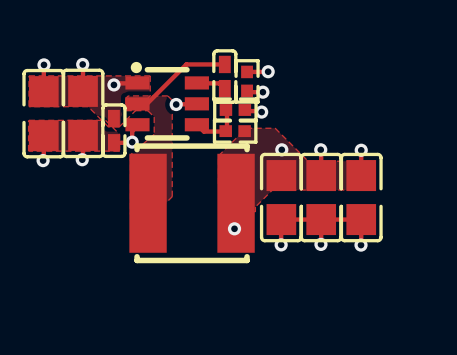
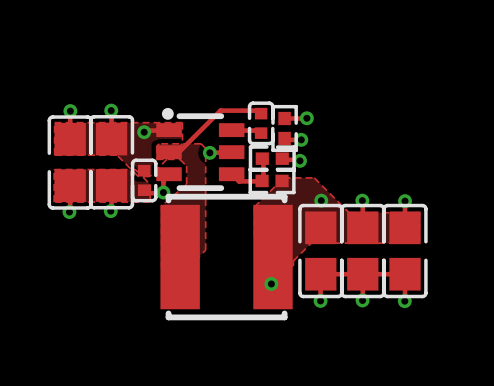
part footprint: [212, 49, 238, 104] -> [247, 101, 275, 146]
part footprint: [101, 103, 127, 159] -> [130, 158, 158, 203]

